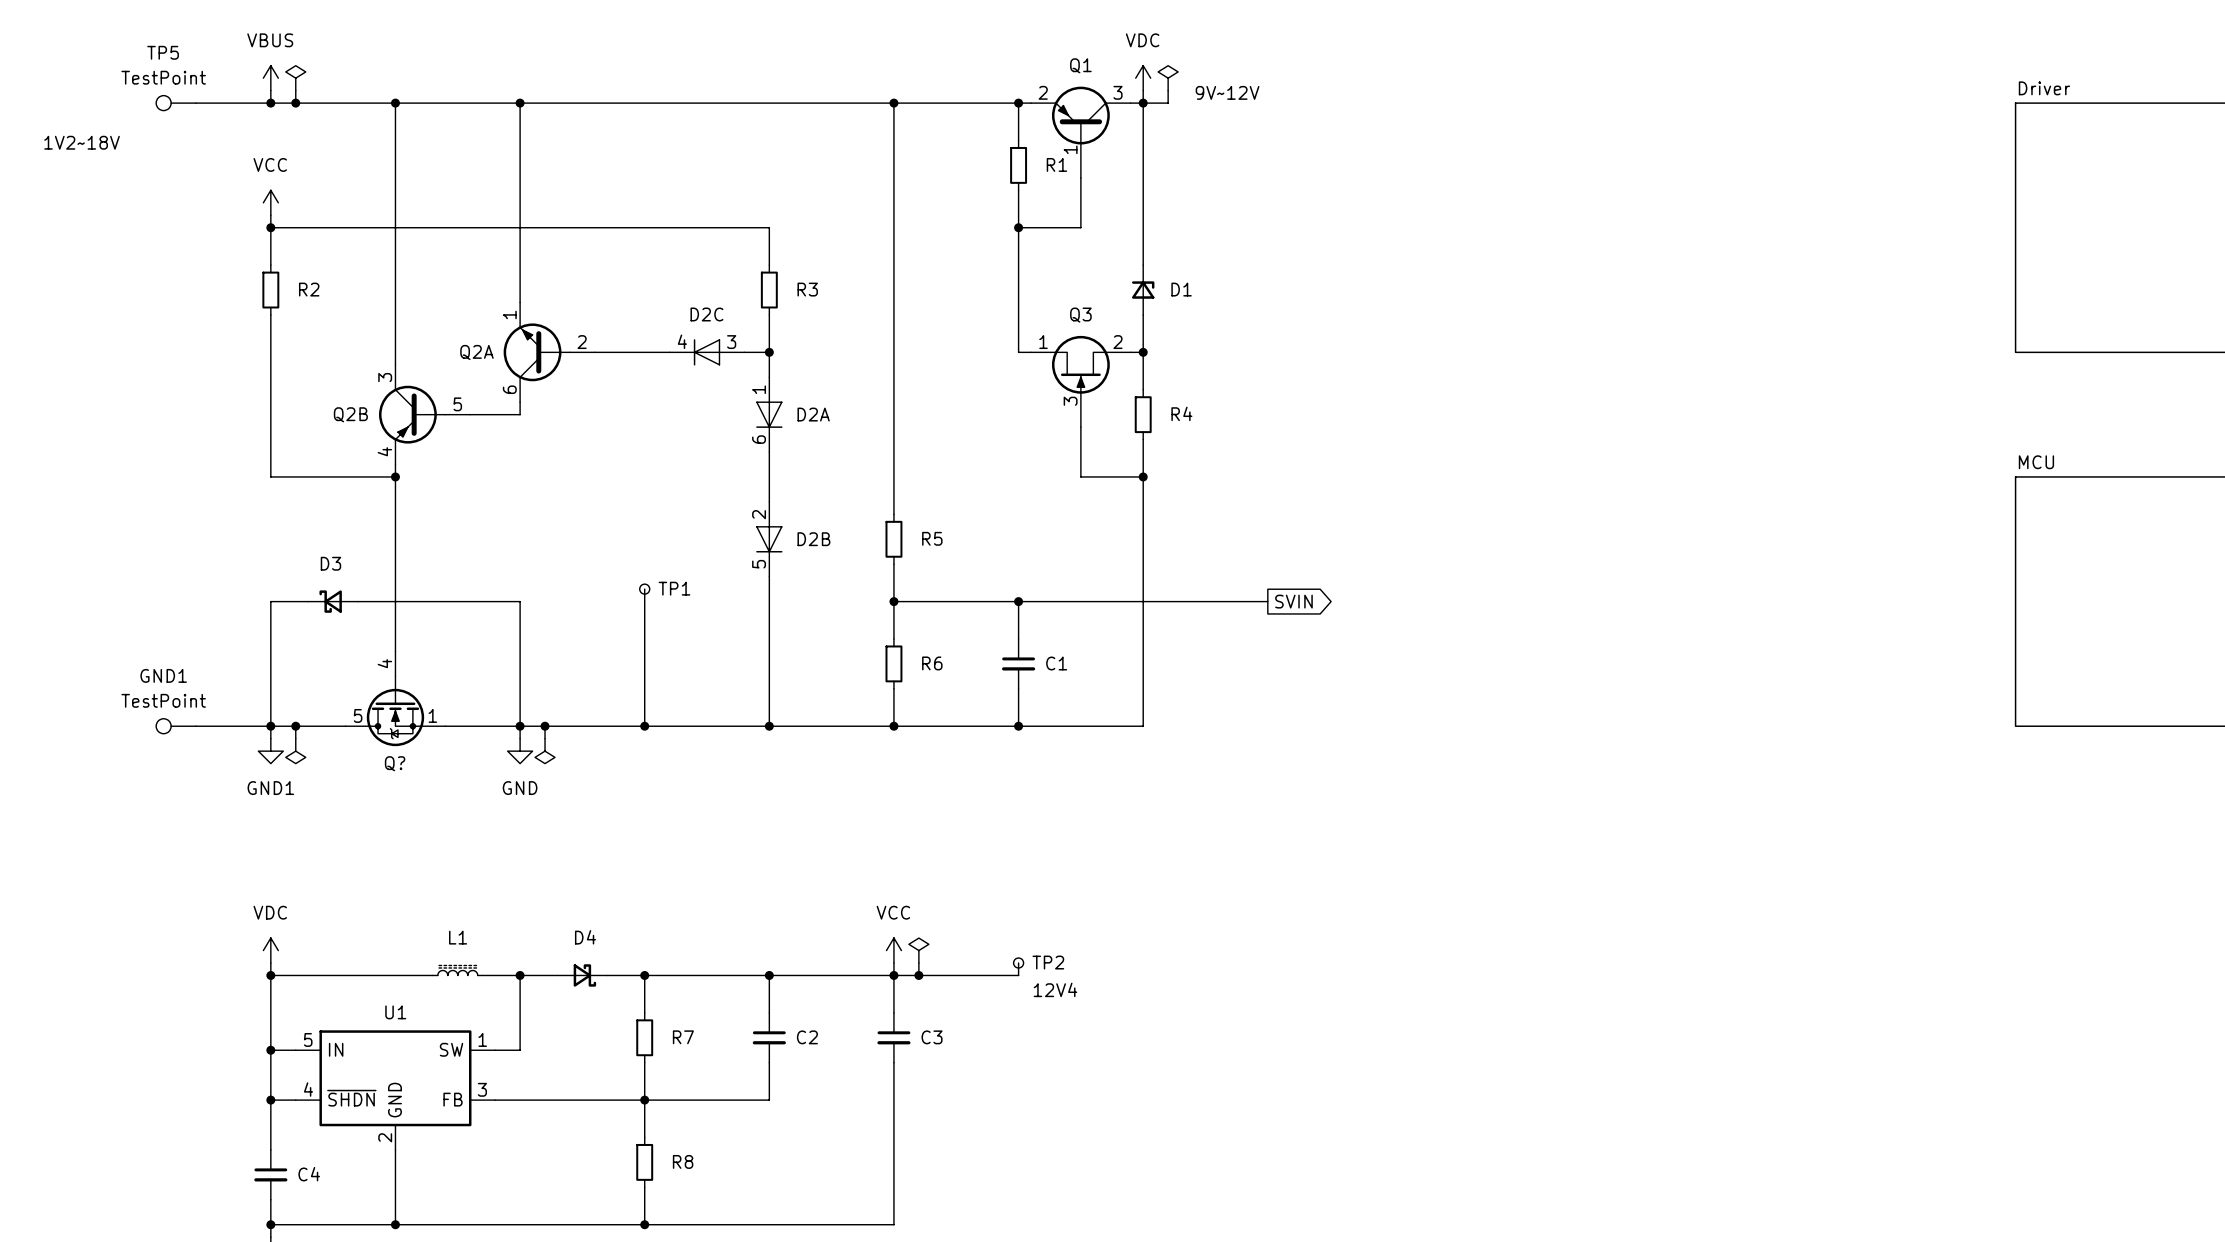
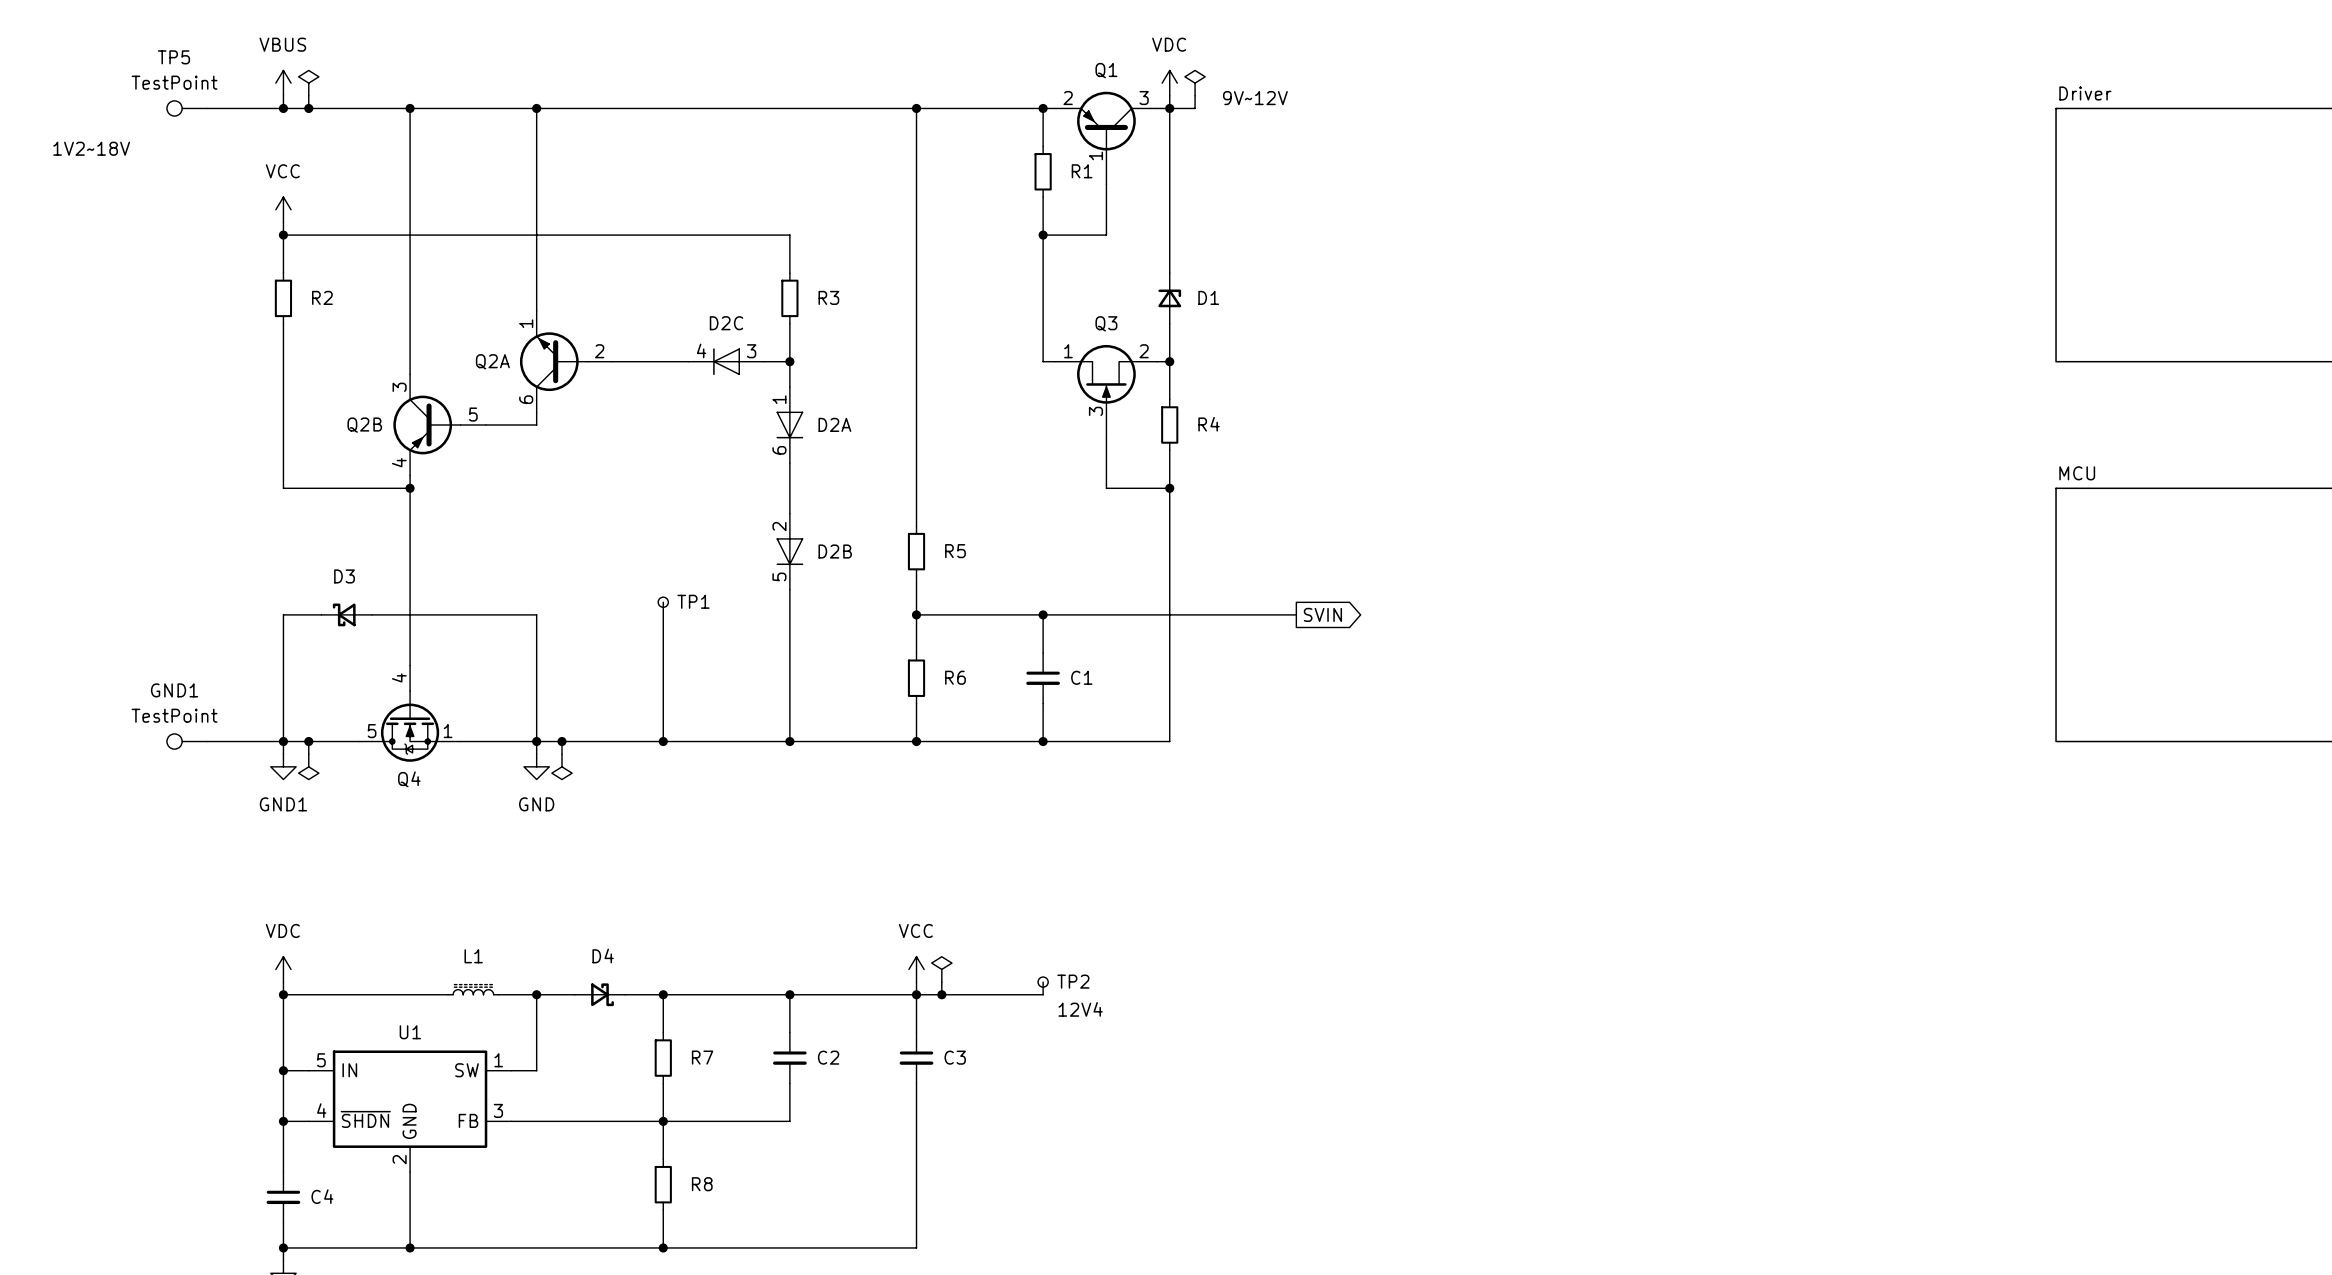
Q? name: Q? (395, 763) -> Q4 (409, 779)

